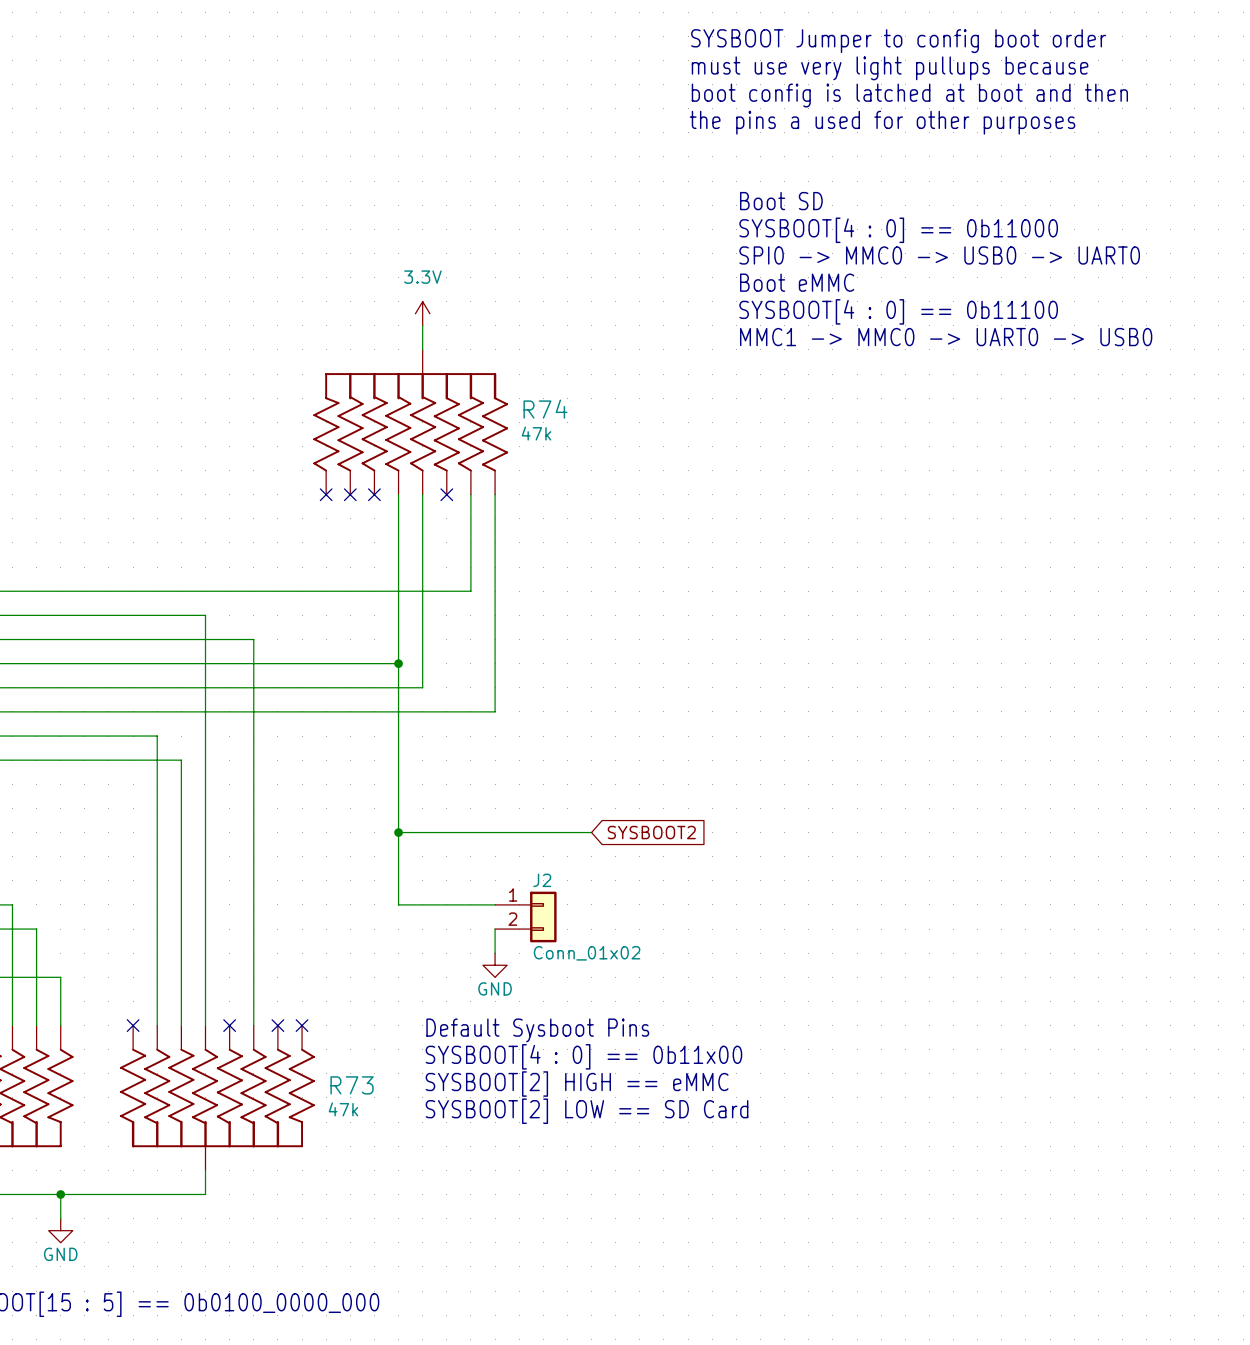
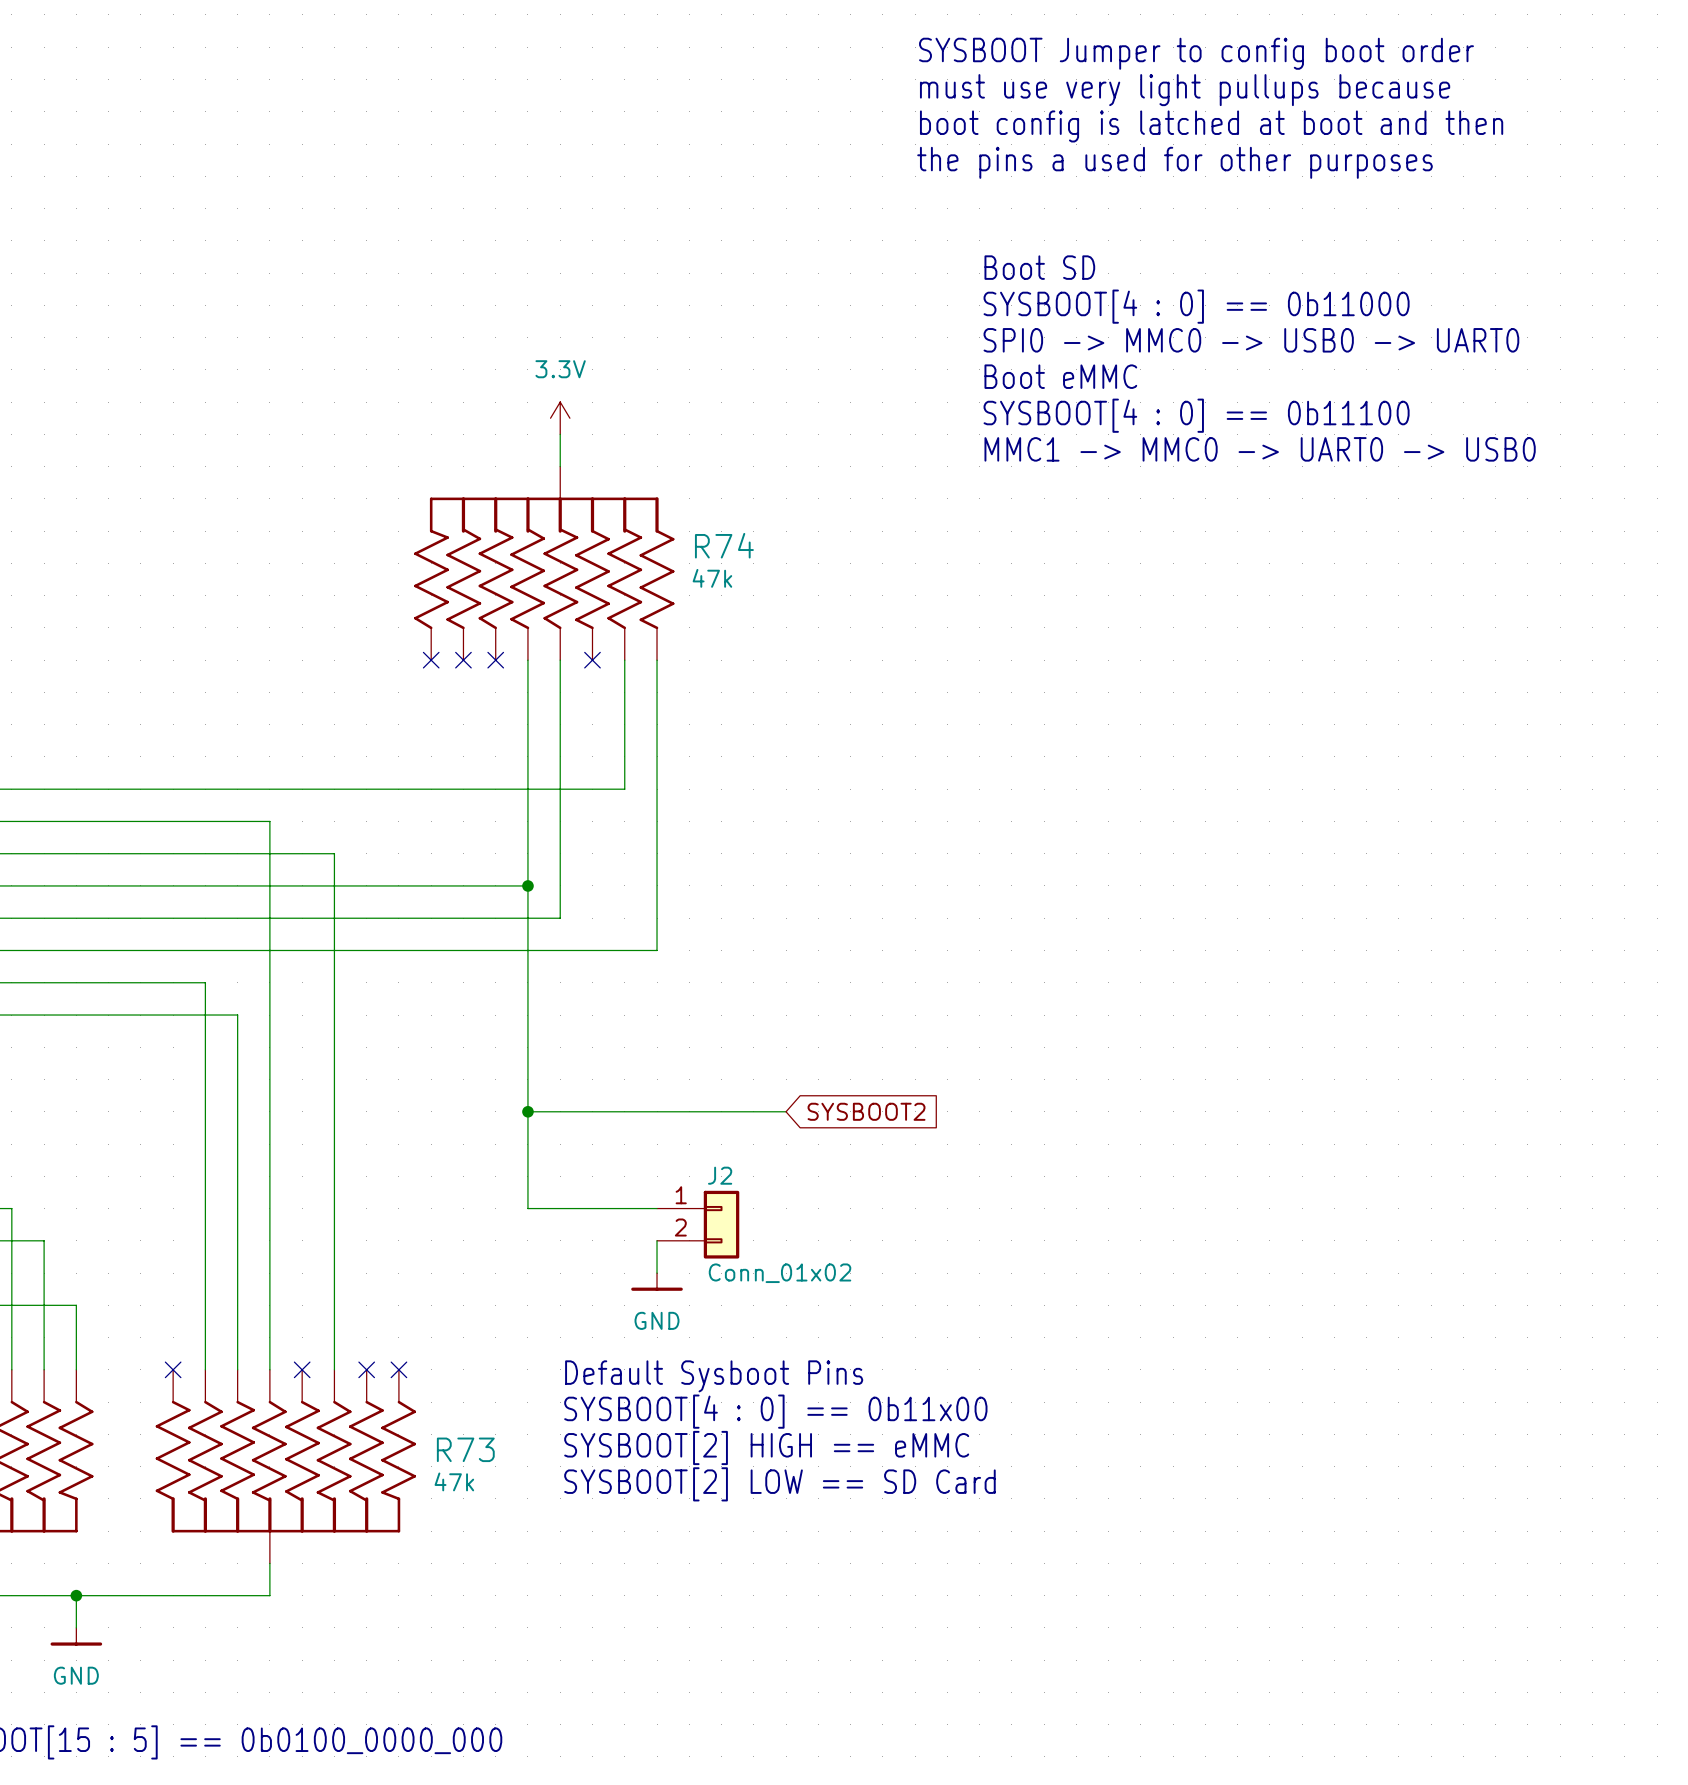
power symbol shape: [482, 953, 508, 978] -> [631, 1273, 683, 1291]
power symbol shape: [48, 1218, 73, 1243] -> [50, 1627, 103, 1646]

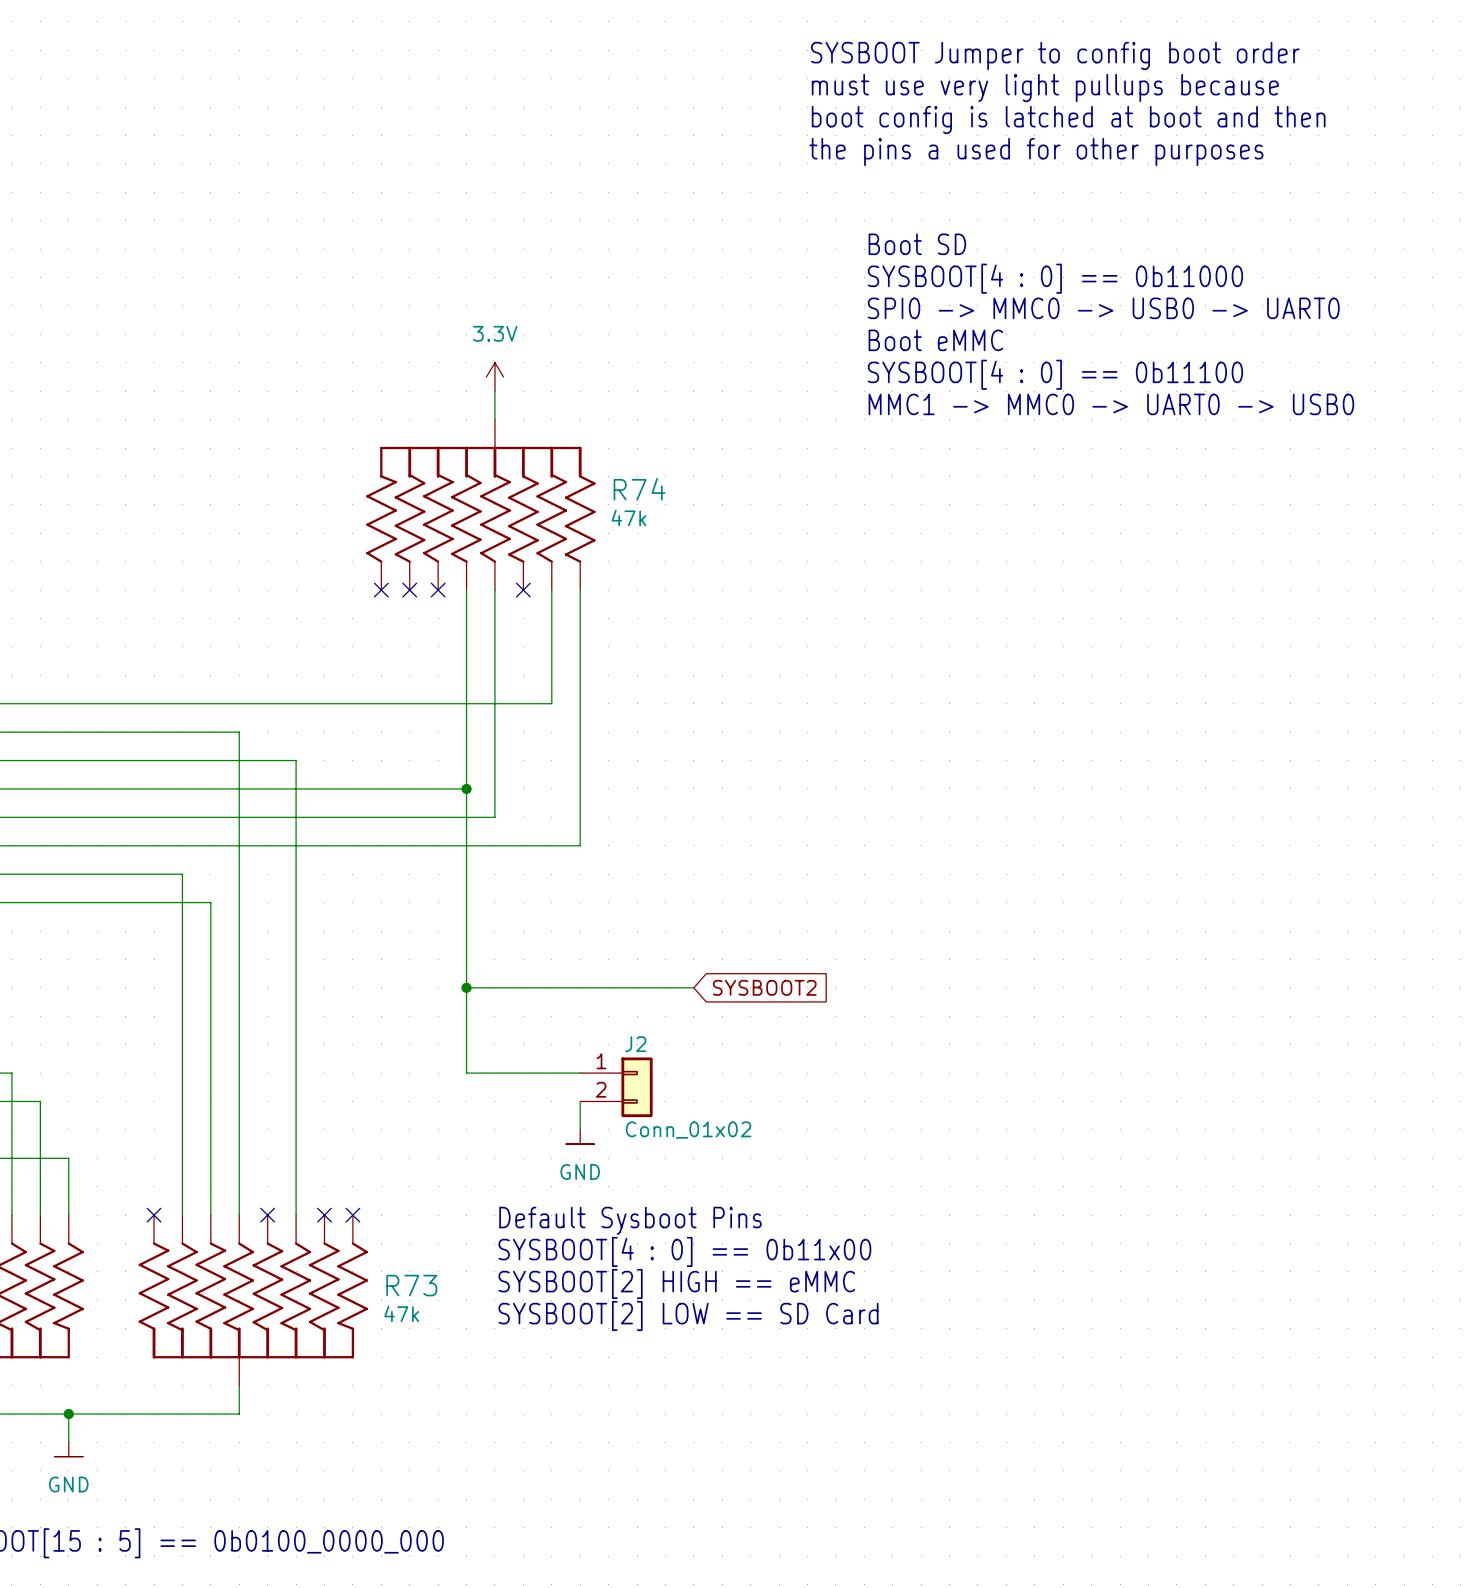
power symbol shape: [631, 1273, 683, 1291] -> [565, 1129, 595, 1145]
power symbol shape: [50, 1627, 103, 1646] -> [54, 1442, 83, 1457]

